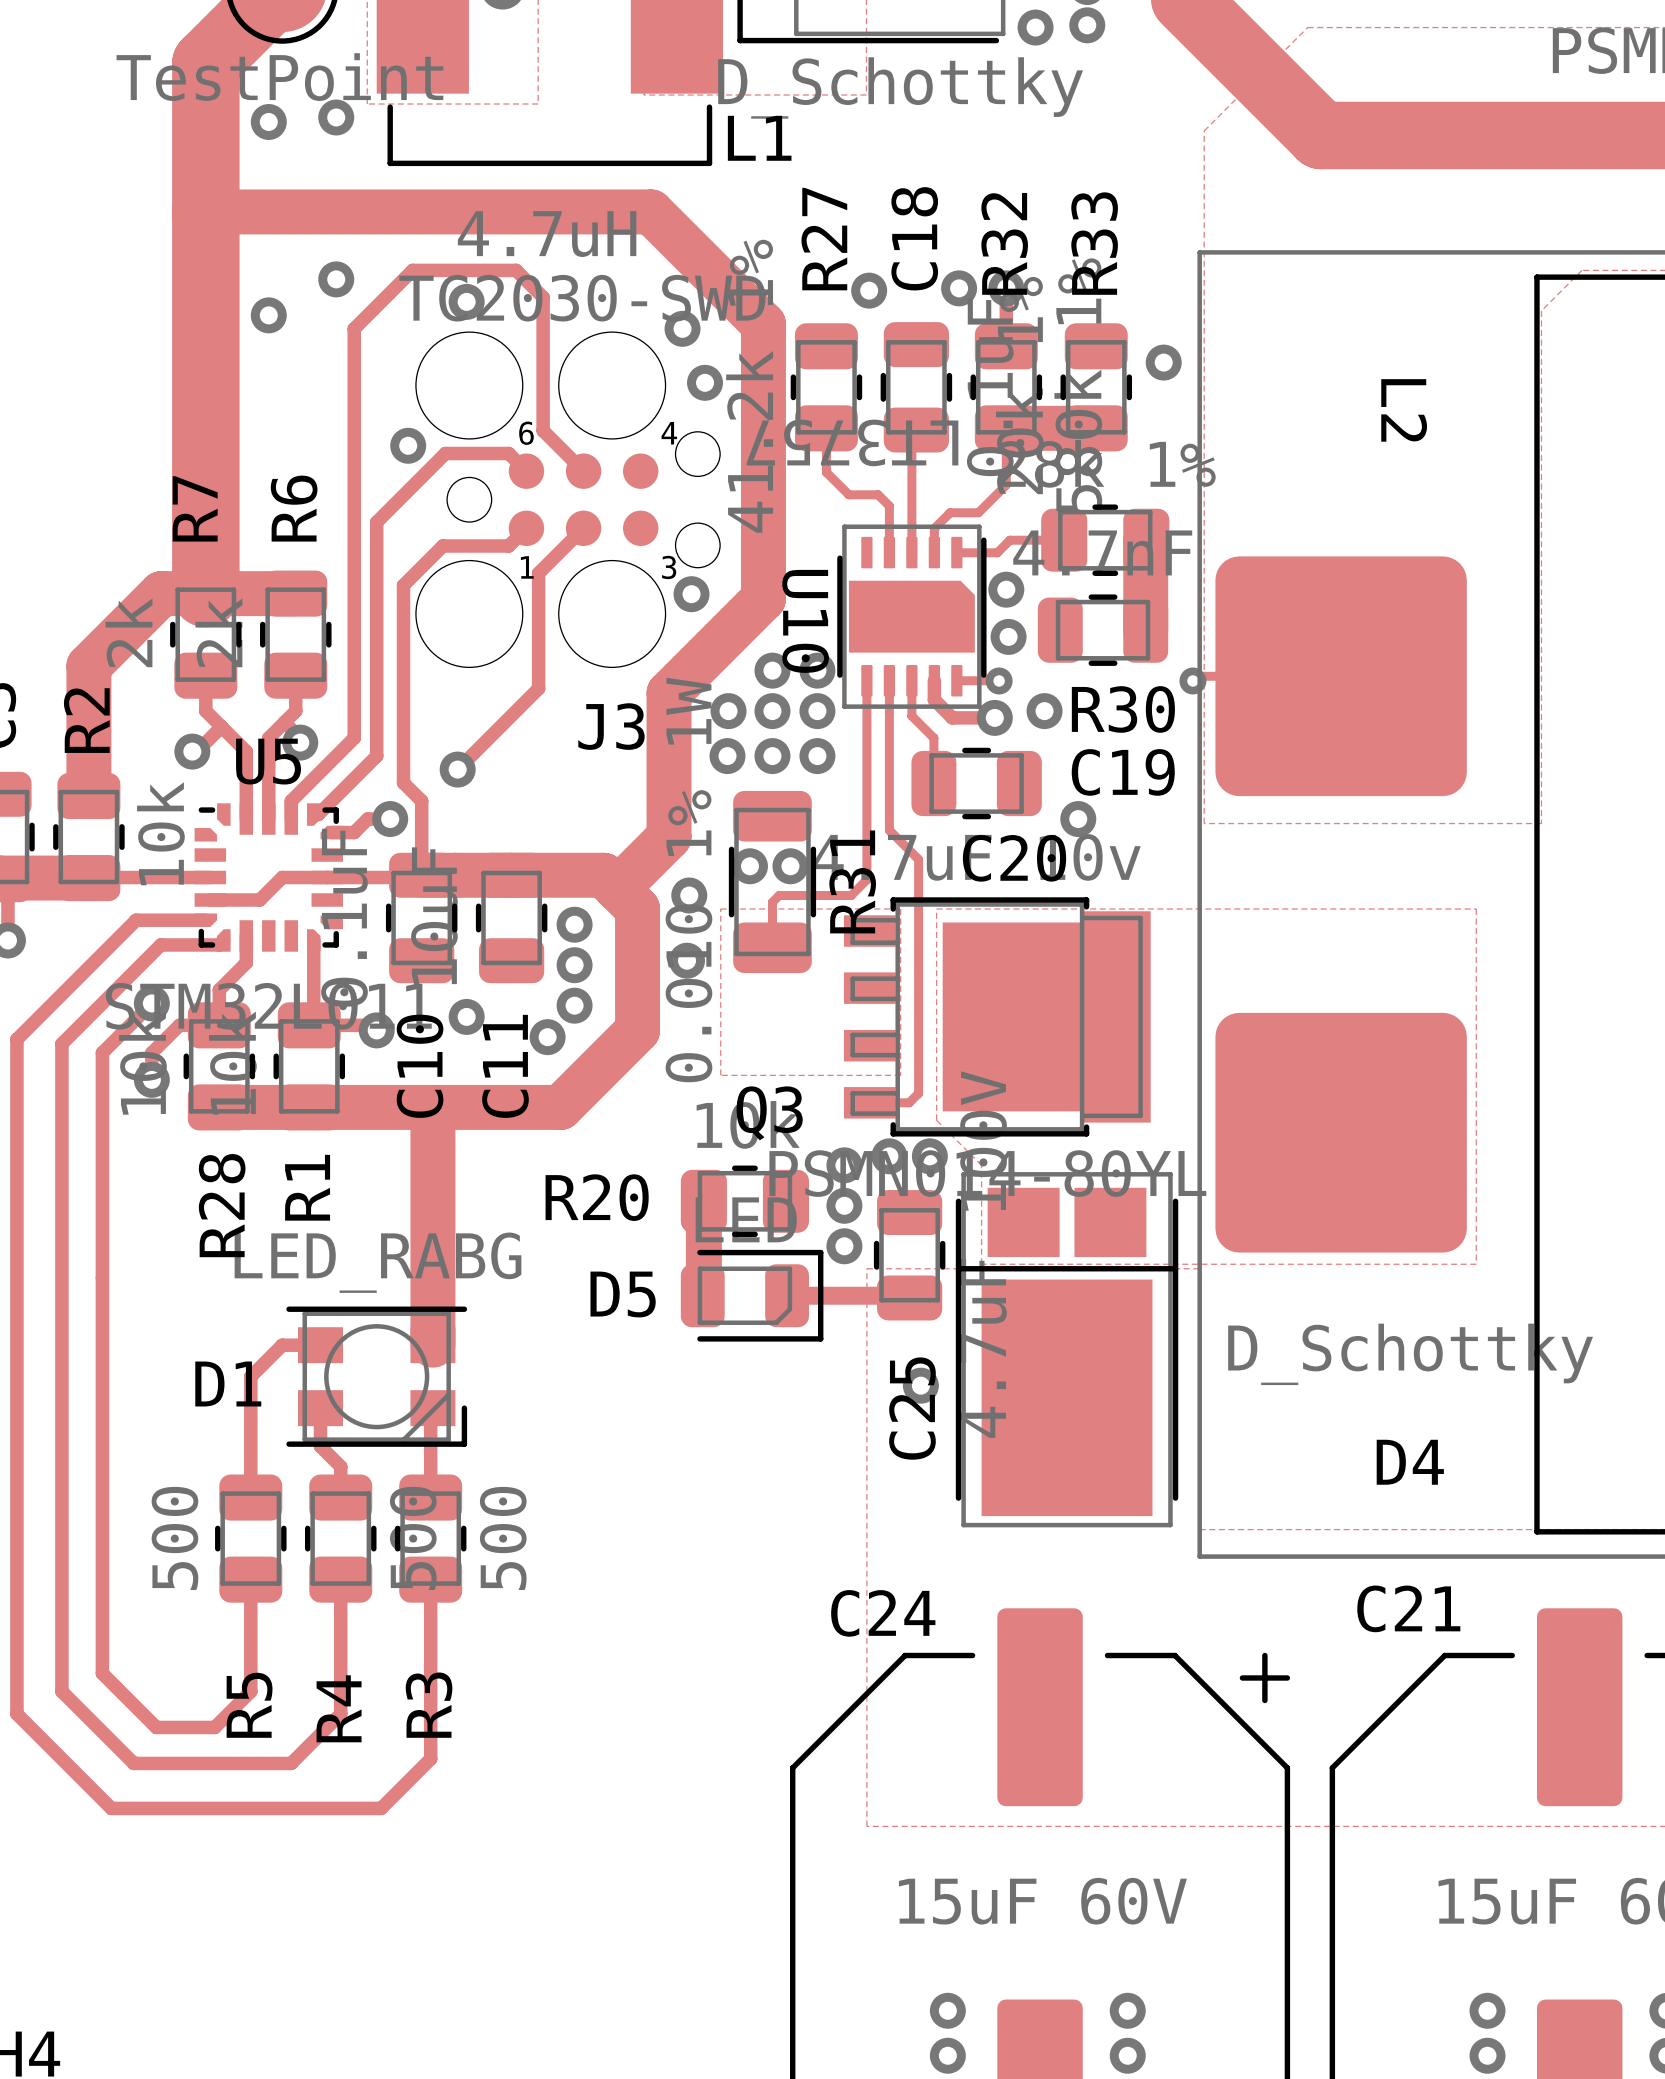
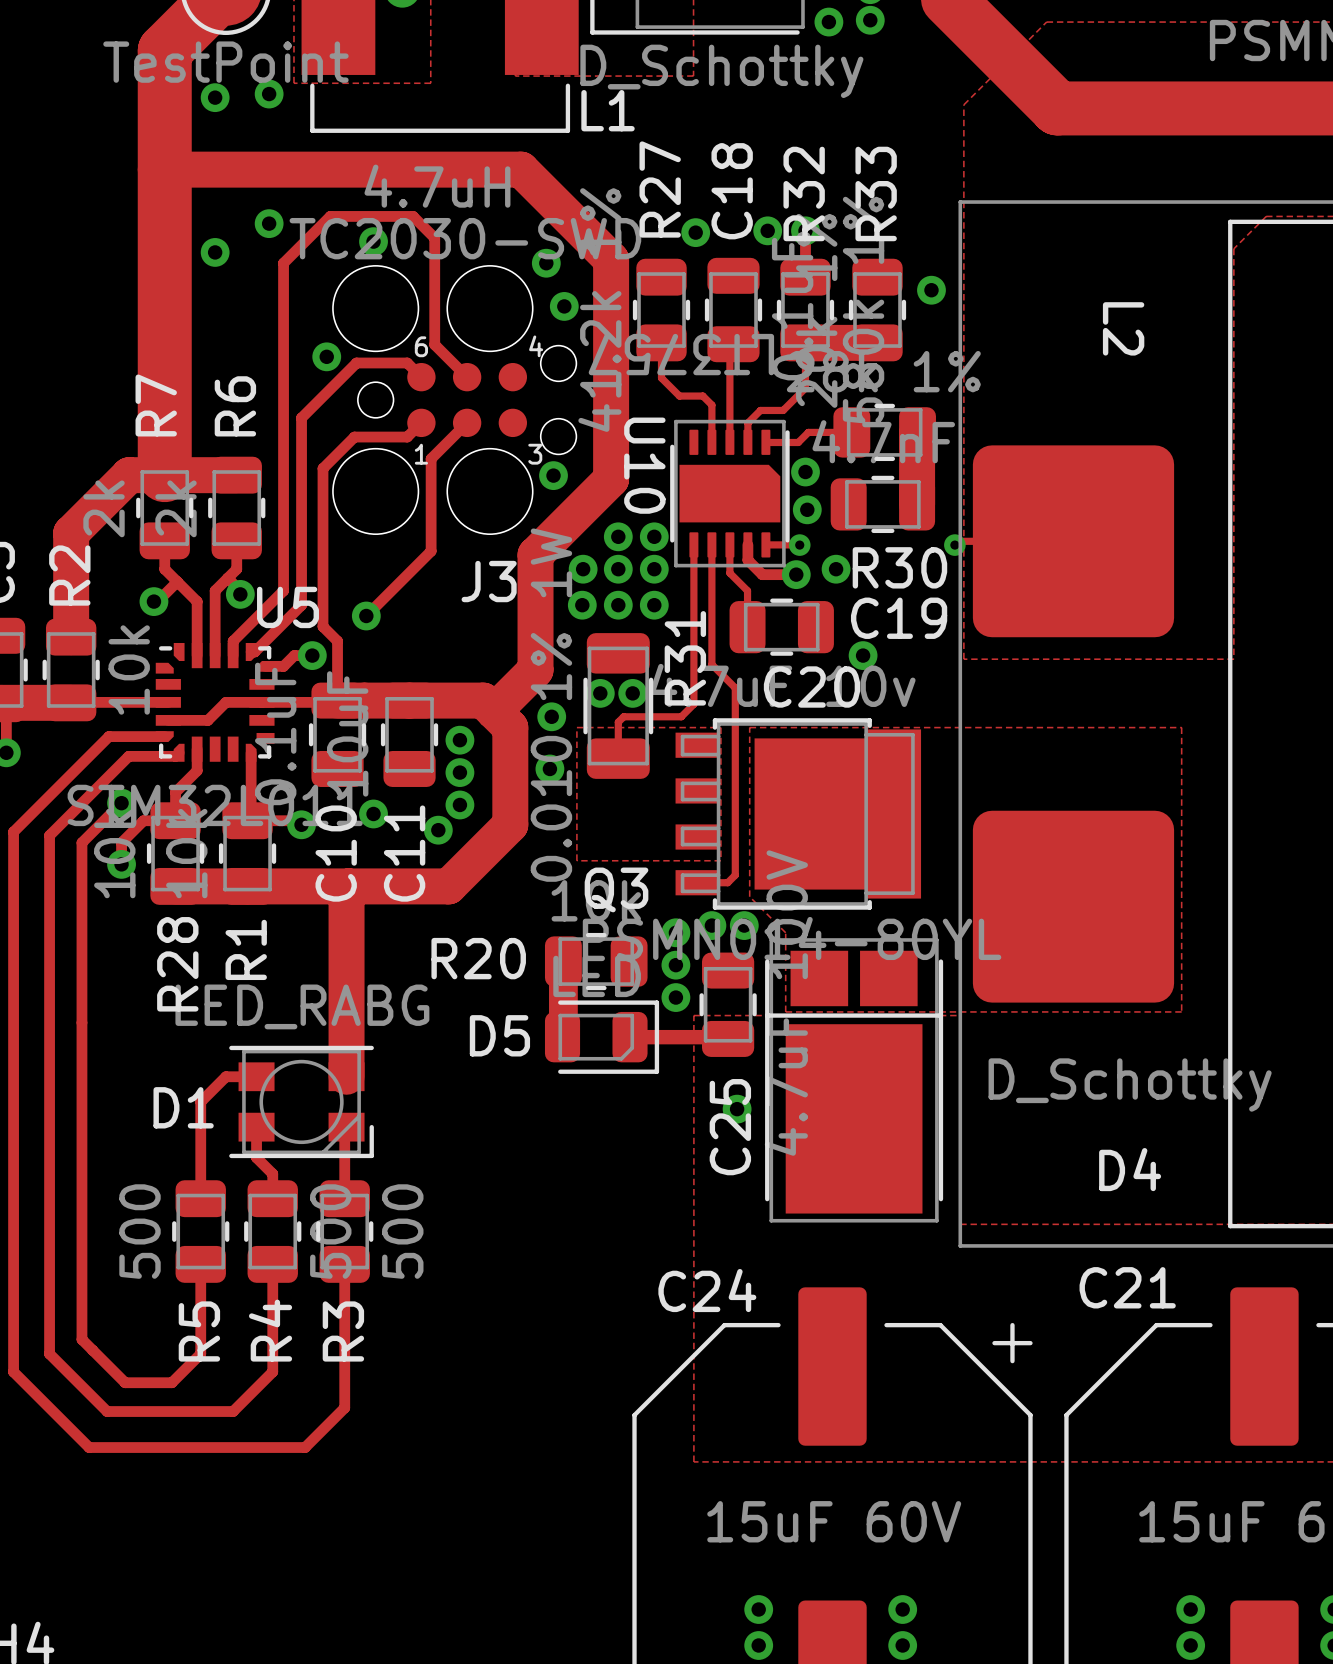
U10 name position: U10 (805, 621) -> U10 (644, 465)
U5 name position: U5 (268, 761) -> U5 (288, 607)
R31 name position: R31 (852, 881) -> R31 (685, 658)
R5 name position: R5 (249, 1705) -> R5 (199, 1331)
R3 name position: R3 (429, 1705) -> R3 (343, 1331)
R4 name position: R4 (339, 1708) -> R4 (270, 1330)

